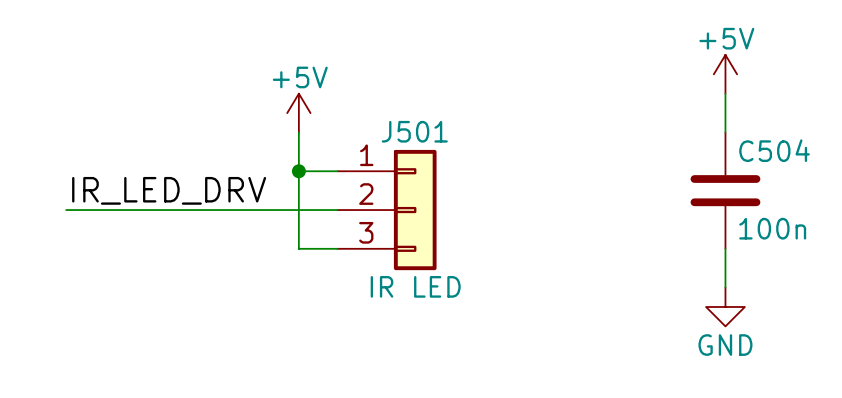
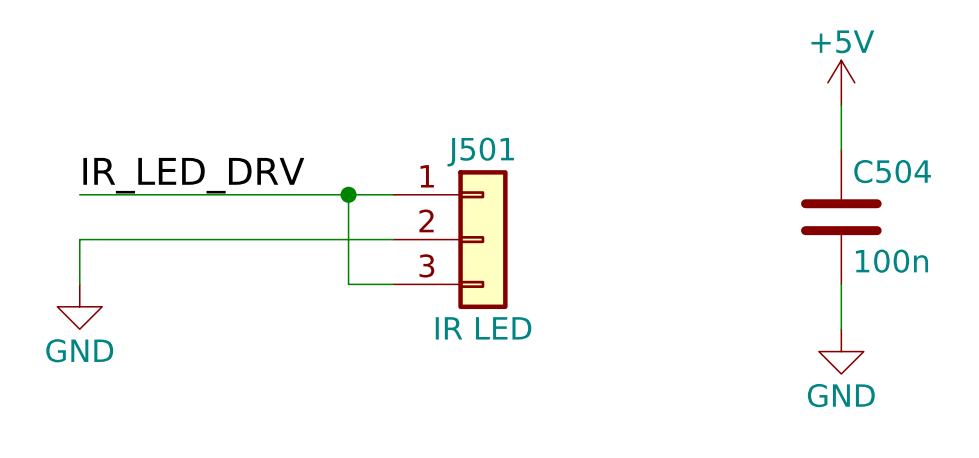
power symbol: +5V (298, 113) -> none
wire: (298, 132) (298, 171) -> (79, 194) (348, 194)
label position: IR_LED_DRV (169, 190) -> IR_LED_DRV (193, 175)
wire: none -> (79, 239) (79, 284)
power symbol: none -> GND (79, 306)

